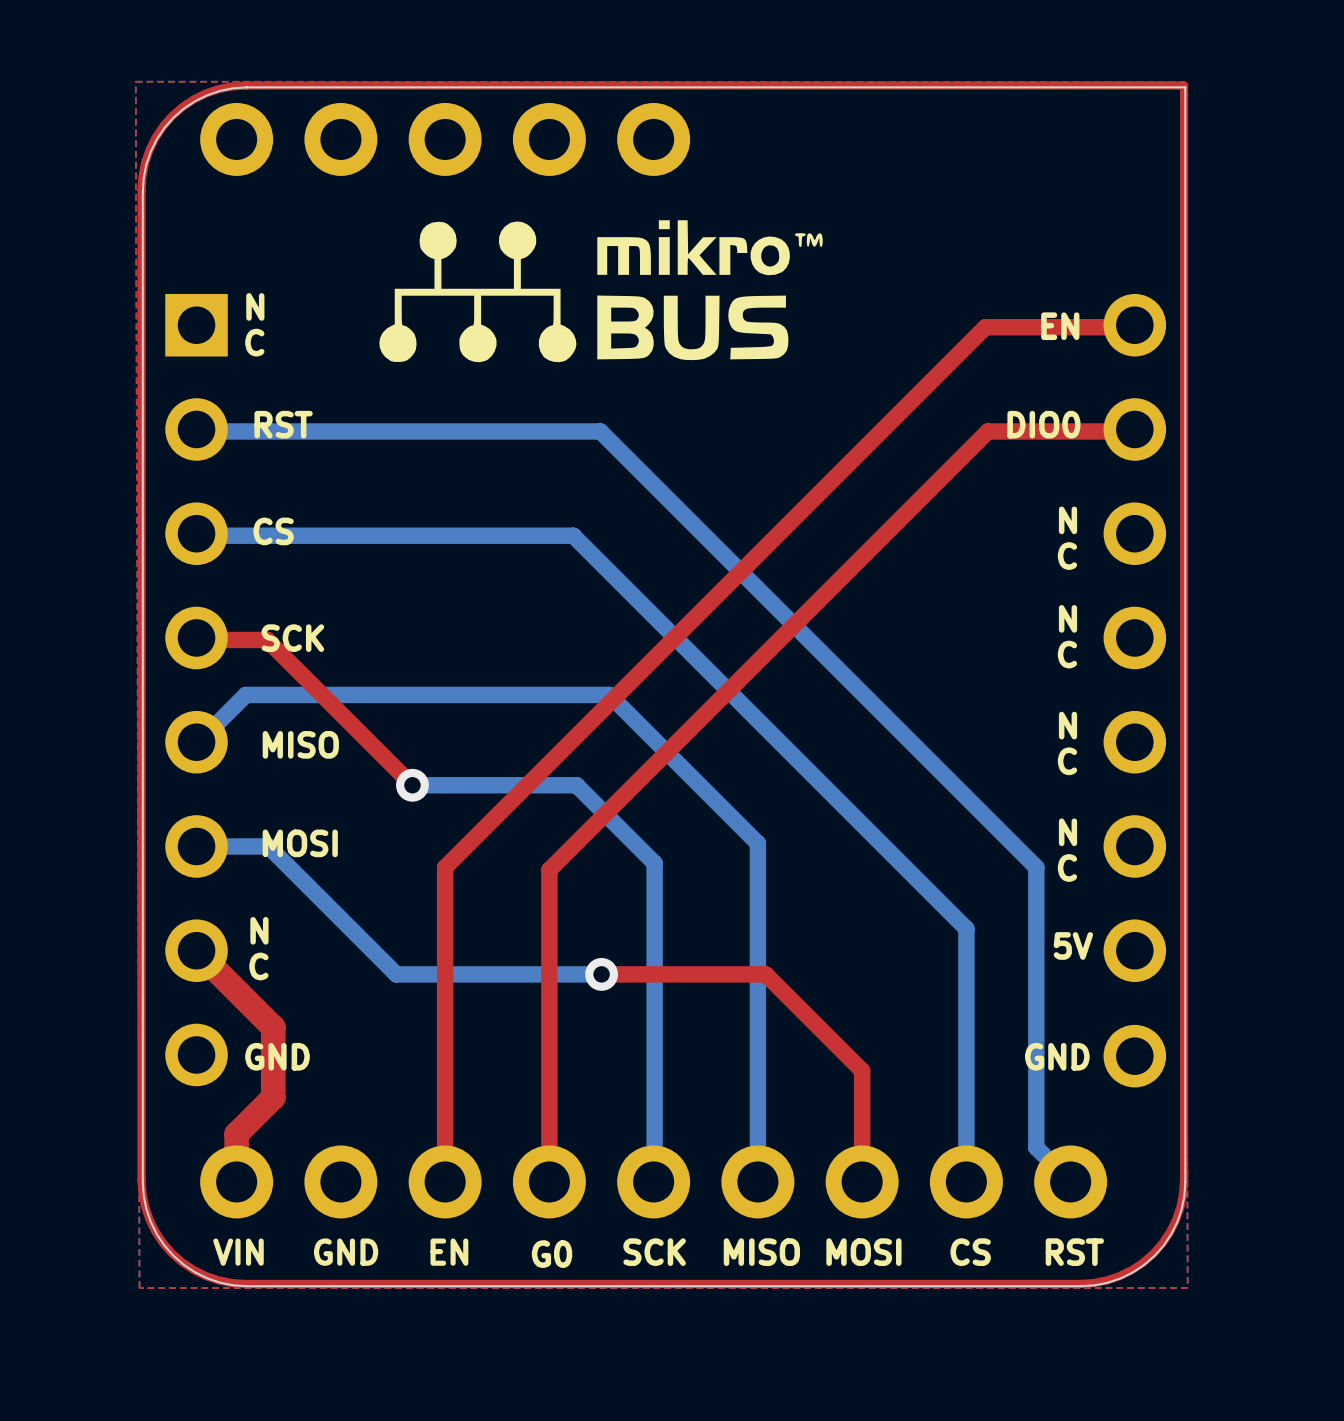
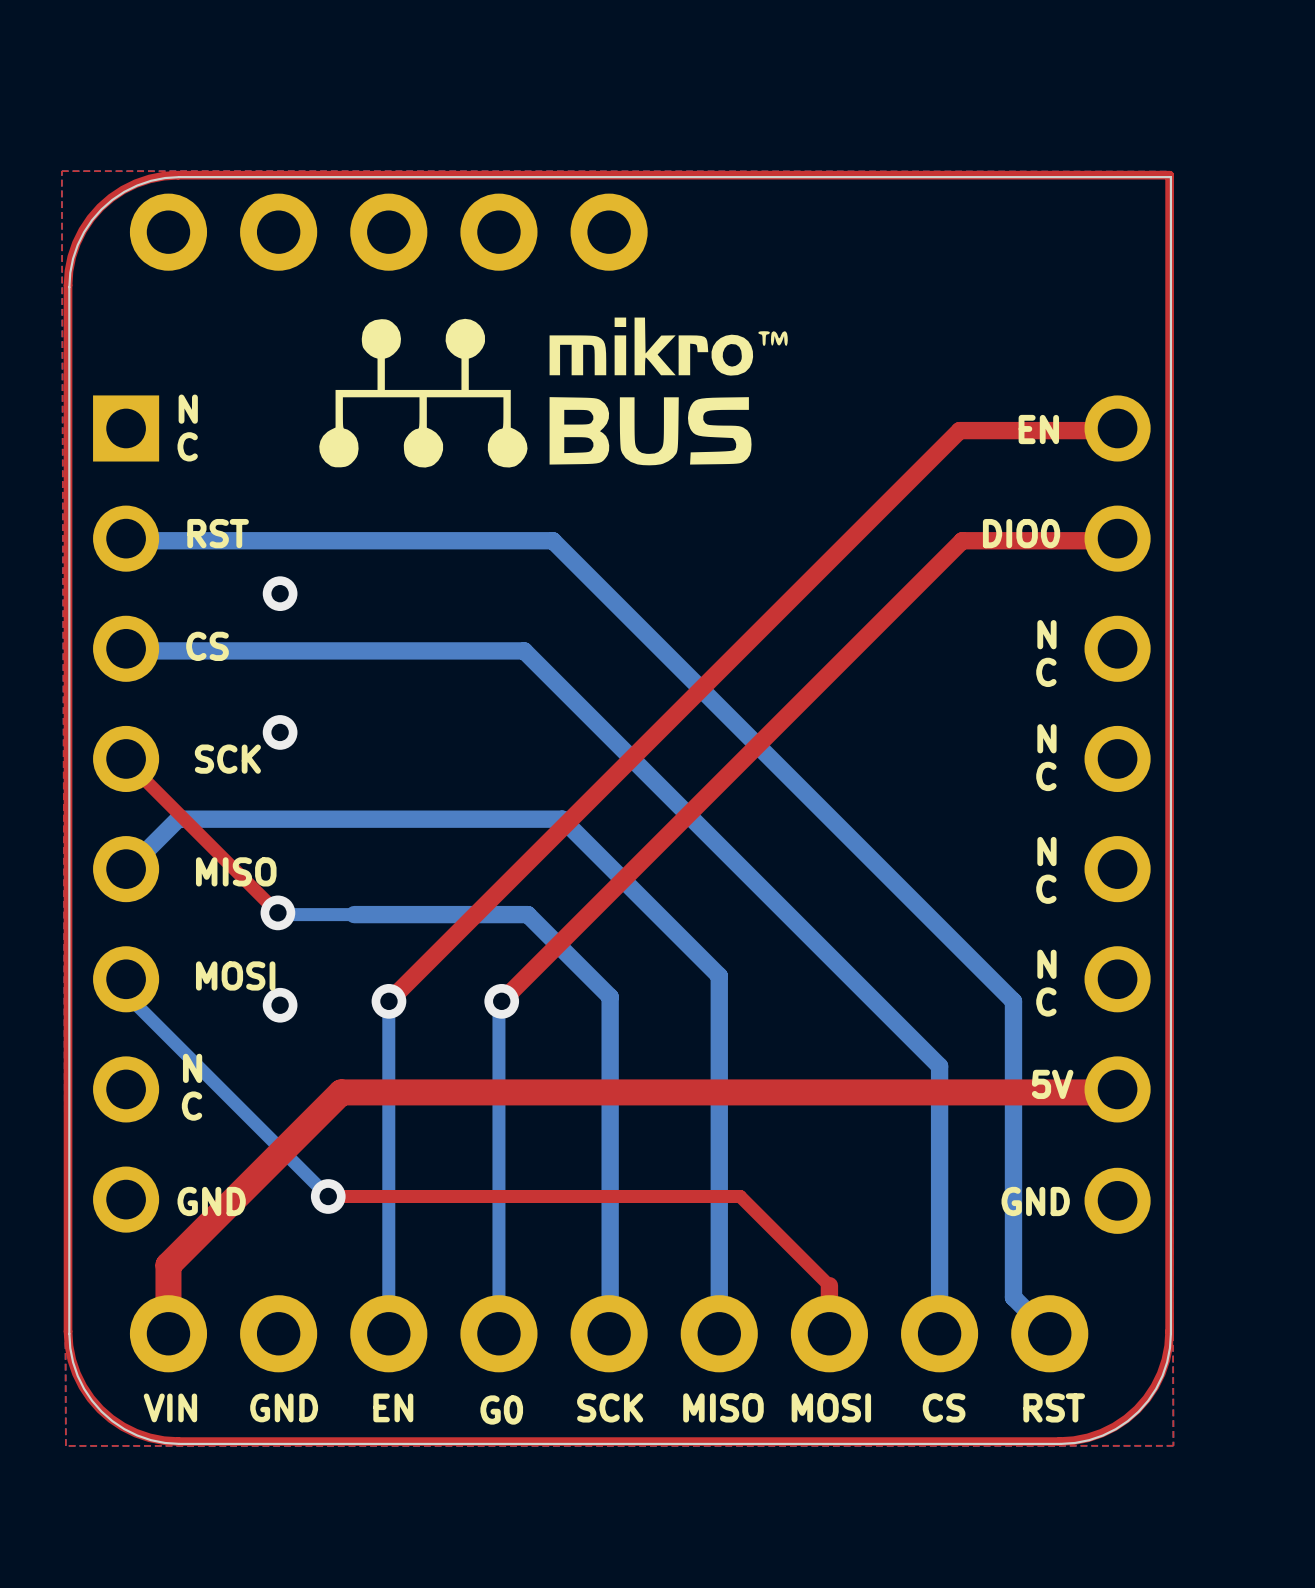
via: none -> (280, 593)
via: none -> (280, 732)
top track: (196, 639) (267, 639) (412, 785) -> (126, 761) (277, 912)
bottom track: none -> (277, 912) (279, 914) (354, 914)
via: none -> (277, 912)
via: (412, 785) -> none
bottom track: (196, 860) (196, 846) (268, 846) (396, 974) (601, 974) -> (126, 994) (328, 1196)
top track: (445, 867) (445, 1181) -> none
bottom track: none -> (388, 1001) (388, 1333)
via: none -> (388, 1001)
top track: (552, 867) (549, 869) (549, 1181) -> none
bottom track: none -> (501, 1001) (498, 1004) (498, 1333)
via: none -> (501, 1001)
via: none -> (280, 1005)
top track: (196, 950) (273, 1027) (273, 1097) (236, 1134) -> (1116, 1092) (341, 1092) (168, 1265) (168, 1283)
top track: (601, 974) (765, 974) (862, 1070) (862, 1136) -> (328, 1196) (740, 1196) (829, 1285)
via: (601, 974) -> none
via: none -> (328, 1196)

